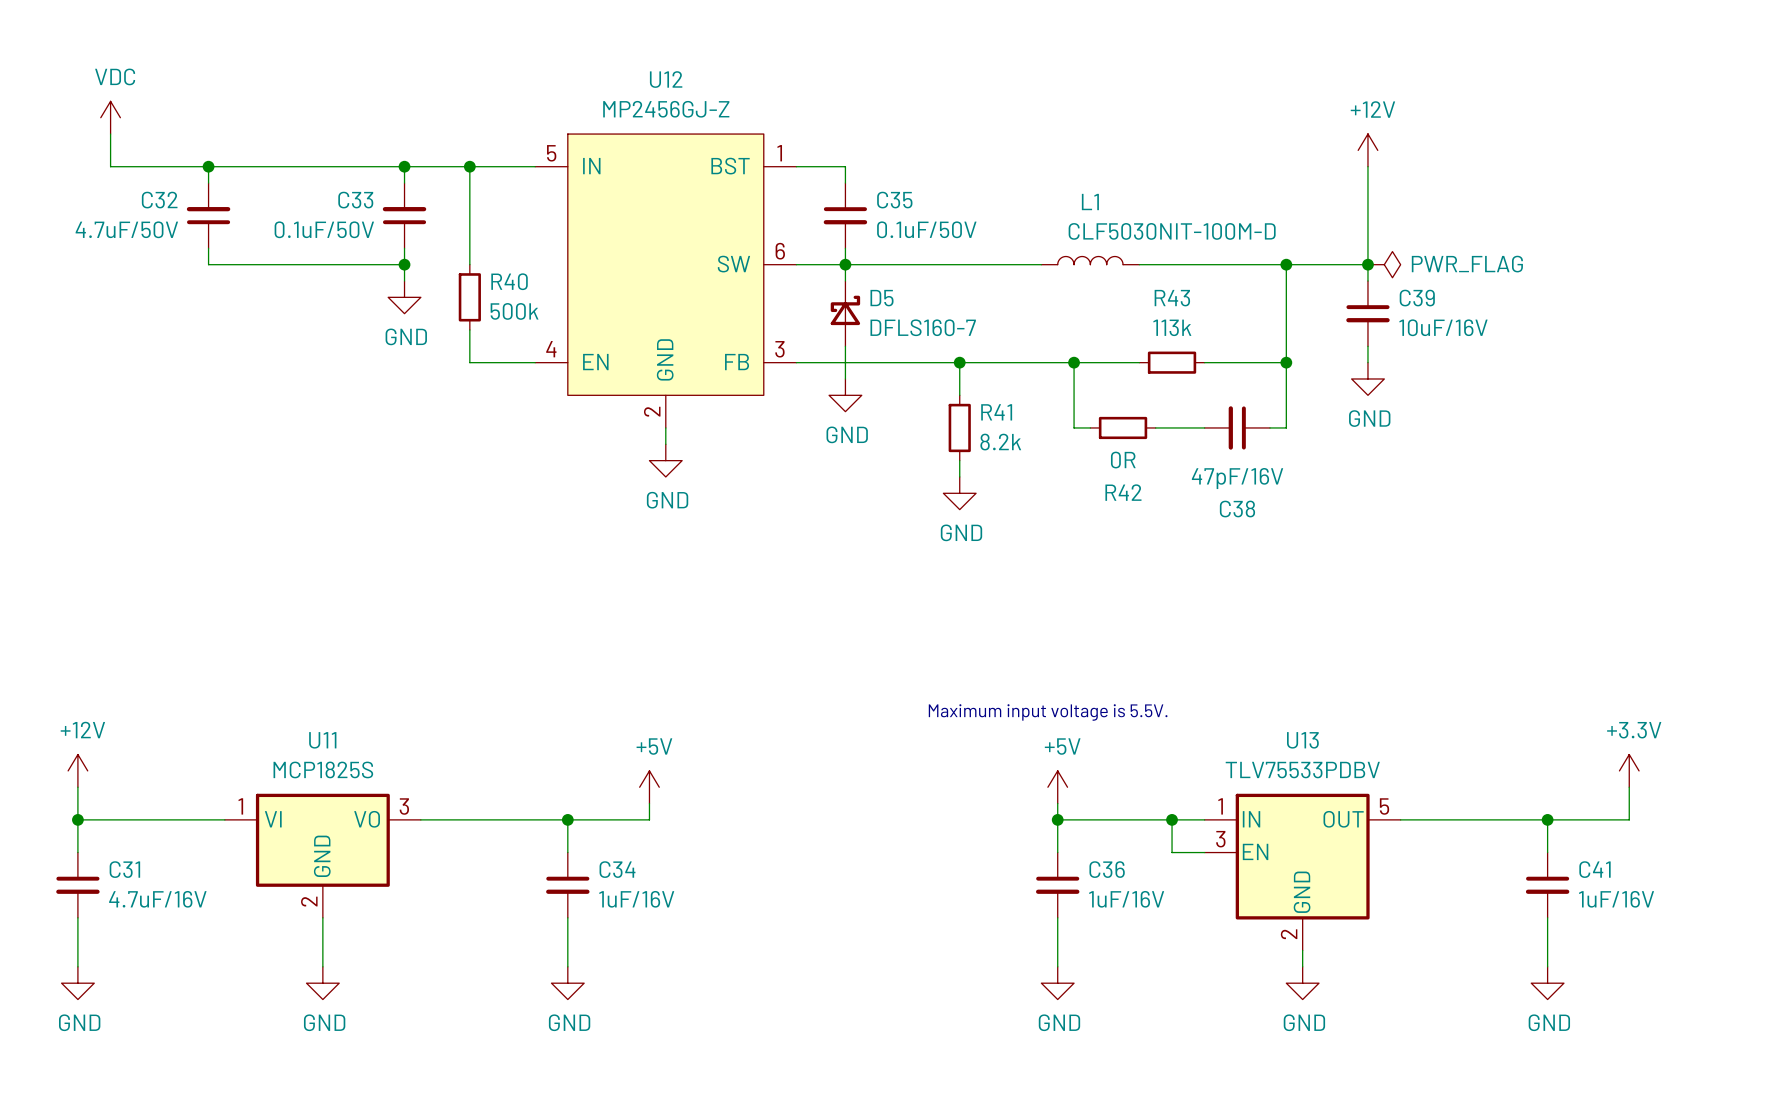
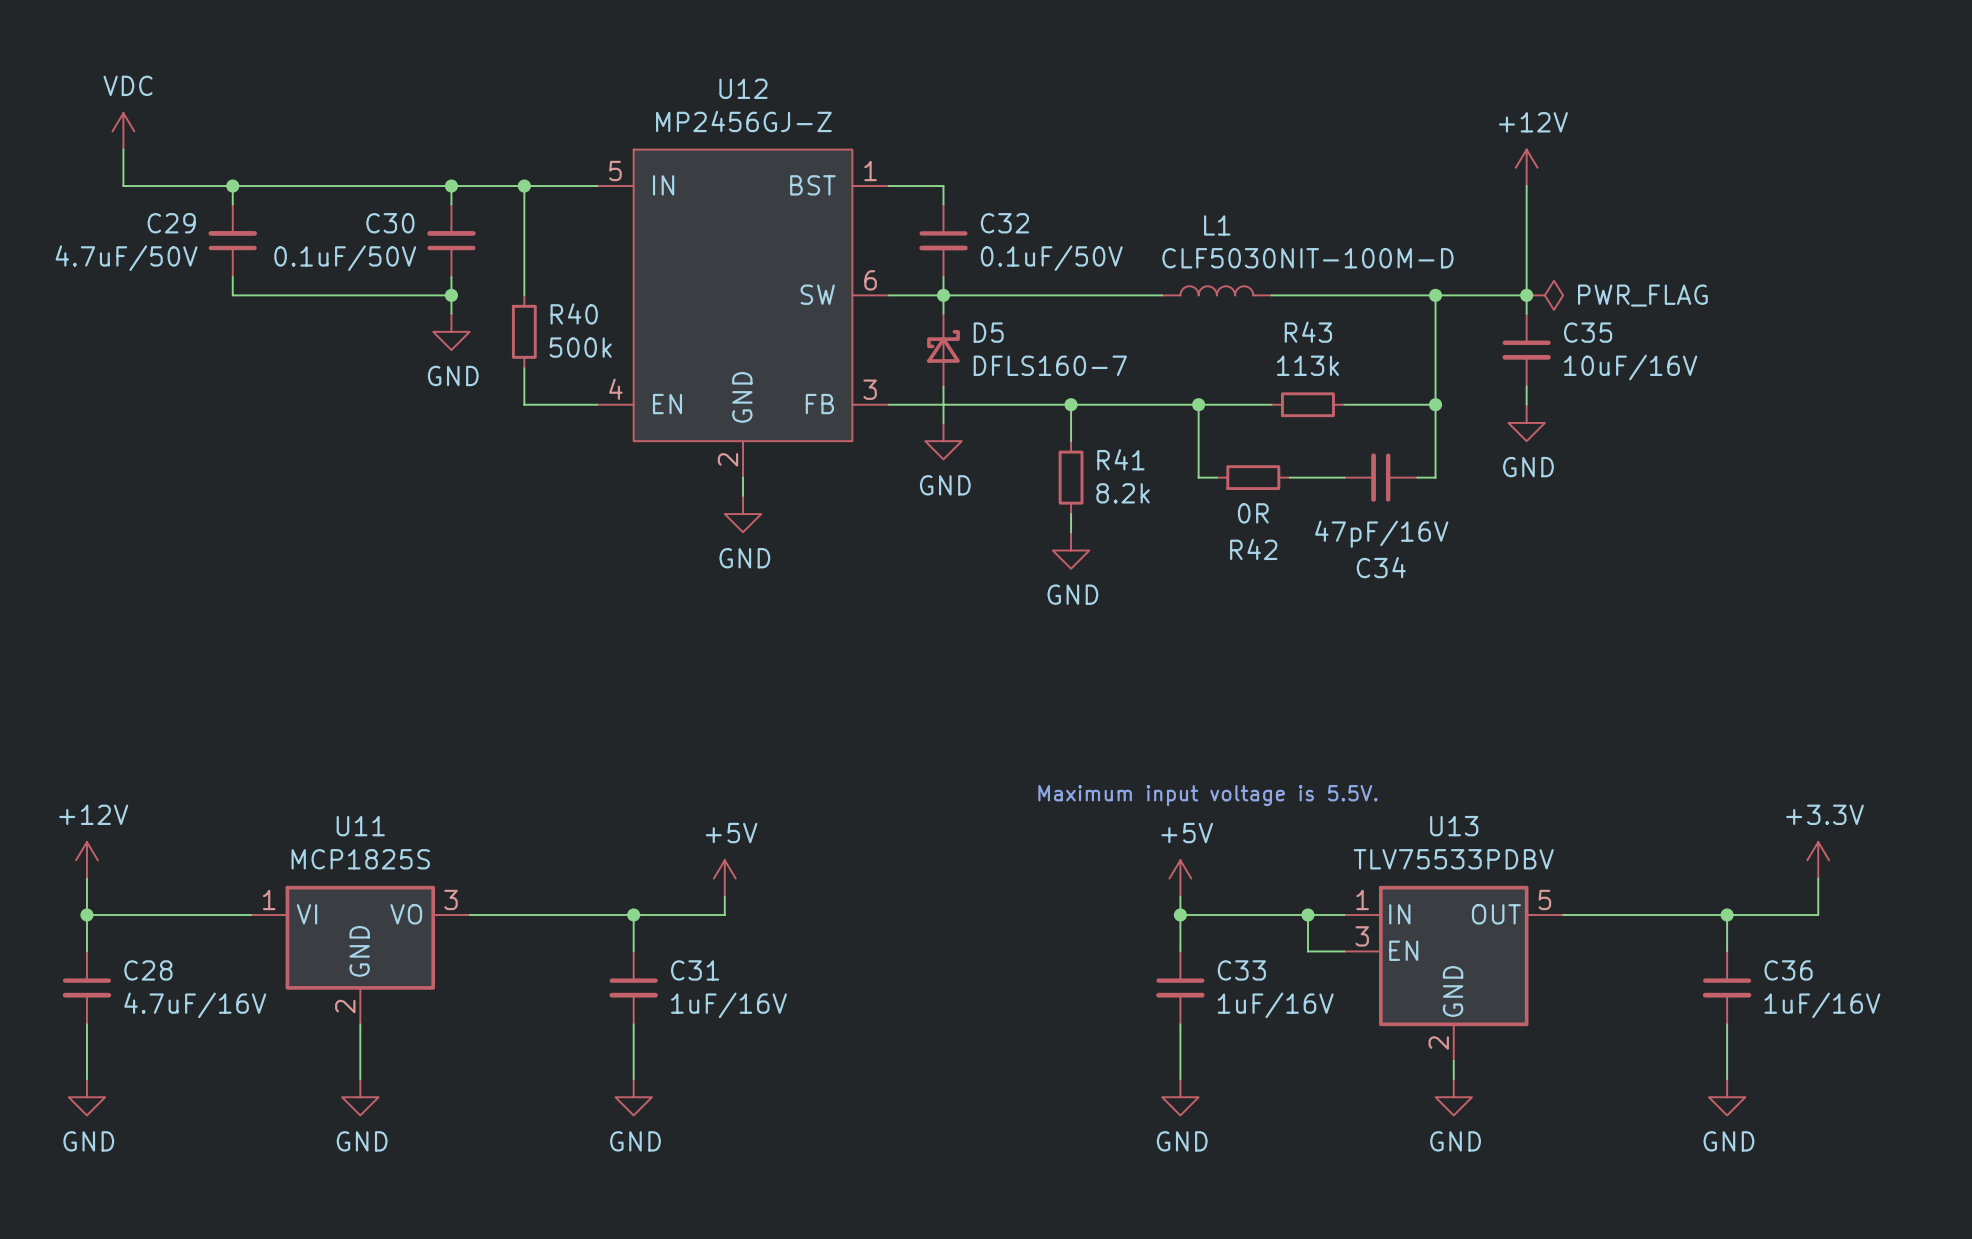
C32 name: C32 (159, 200) -> C29 (171, 223)
C33 name: C33 (355, 200) -> C30 (390, 223)
C35 name: C35 (894, 200) -> C32 (1004, 223)
C39 name: C39 (1417, 298) -> C35 (1588, 332)
C38 name: C38 (1237, 509) -> C34 (1381, 567)
C31 name: C31 (124, 869) -> C28 (148, 970)
C34 name: C34 (617, 869) -> C31 (695, 970)
C36 name: C36 (1107, 869) -> C33 (1241, 970)
C41 name: C41 (1595, 869) -> C36 (1788, 970)

